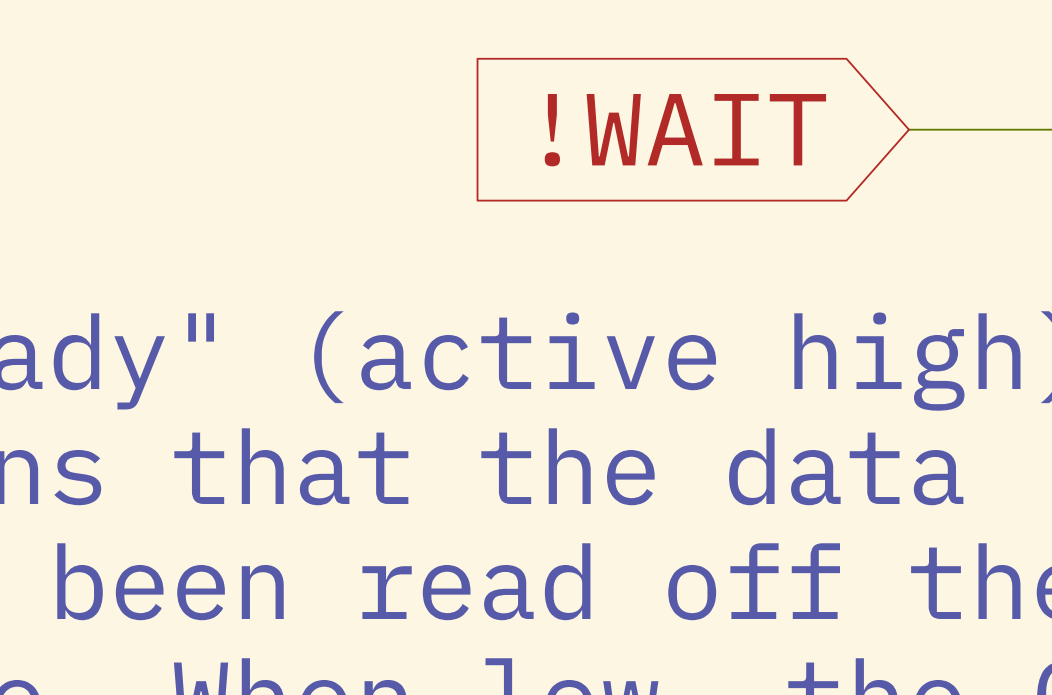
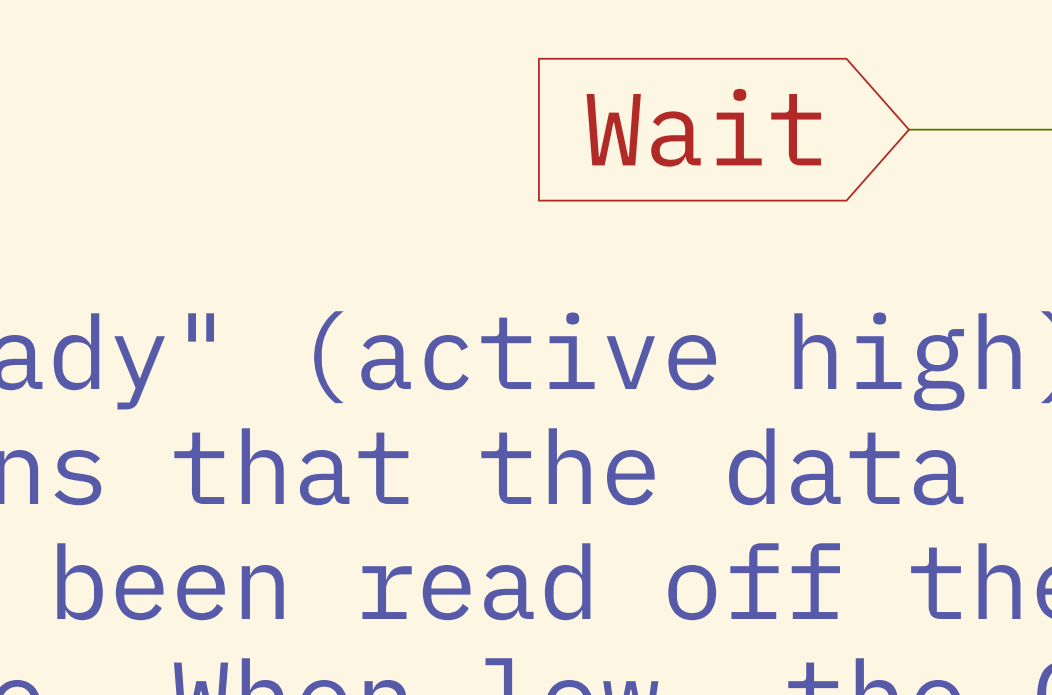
global label: !WAIT (685, 130) -> Wait (703, 127)

